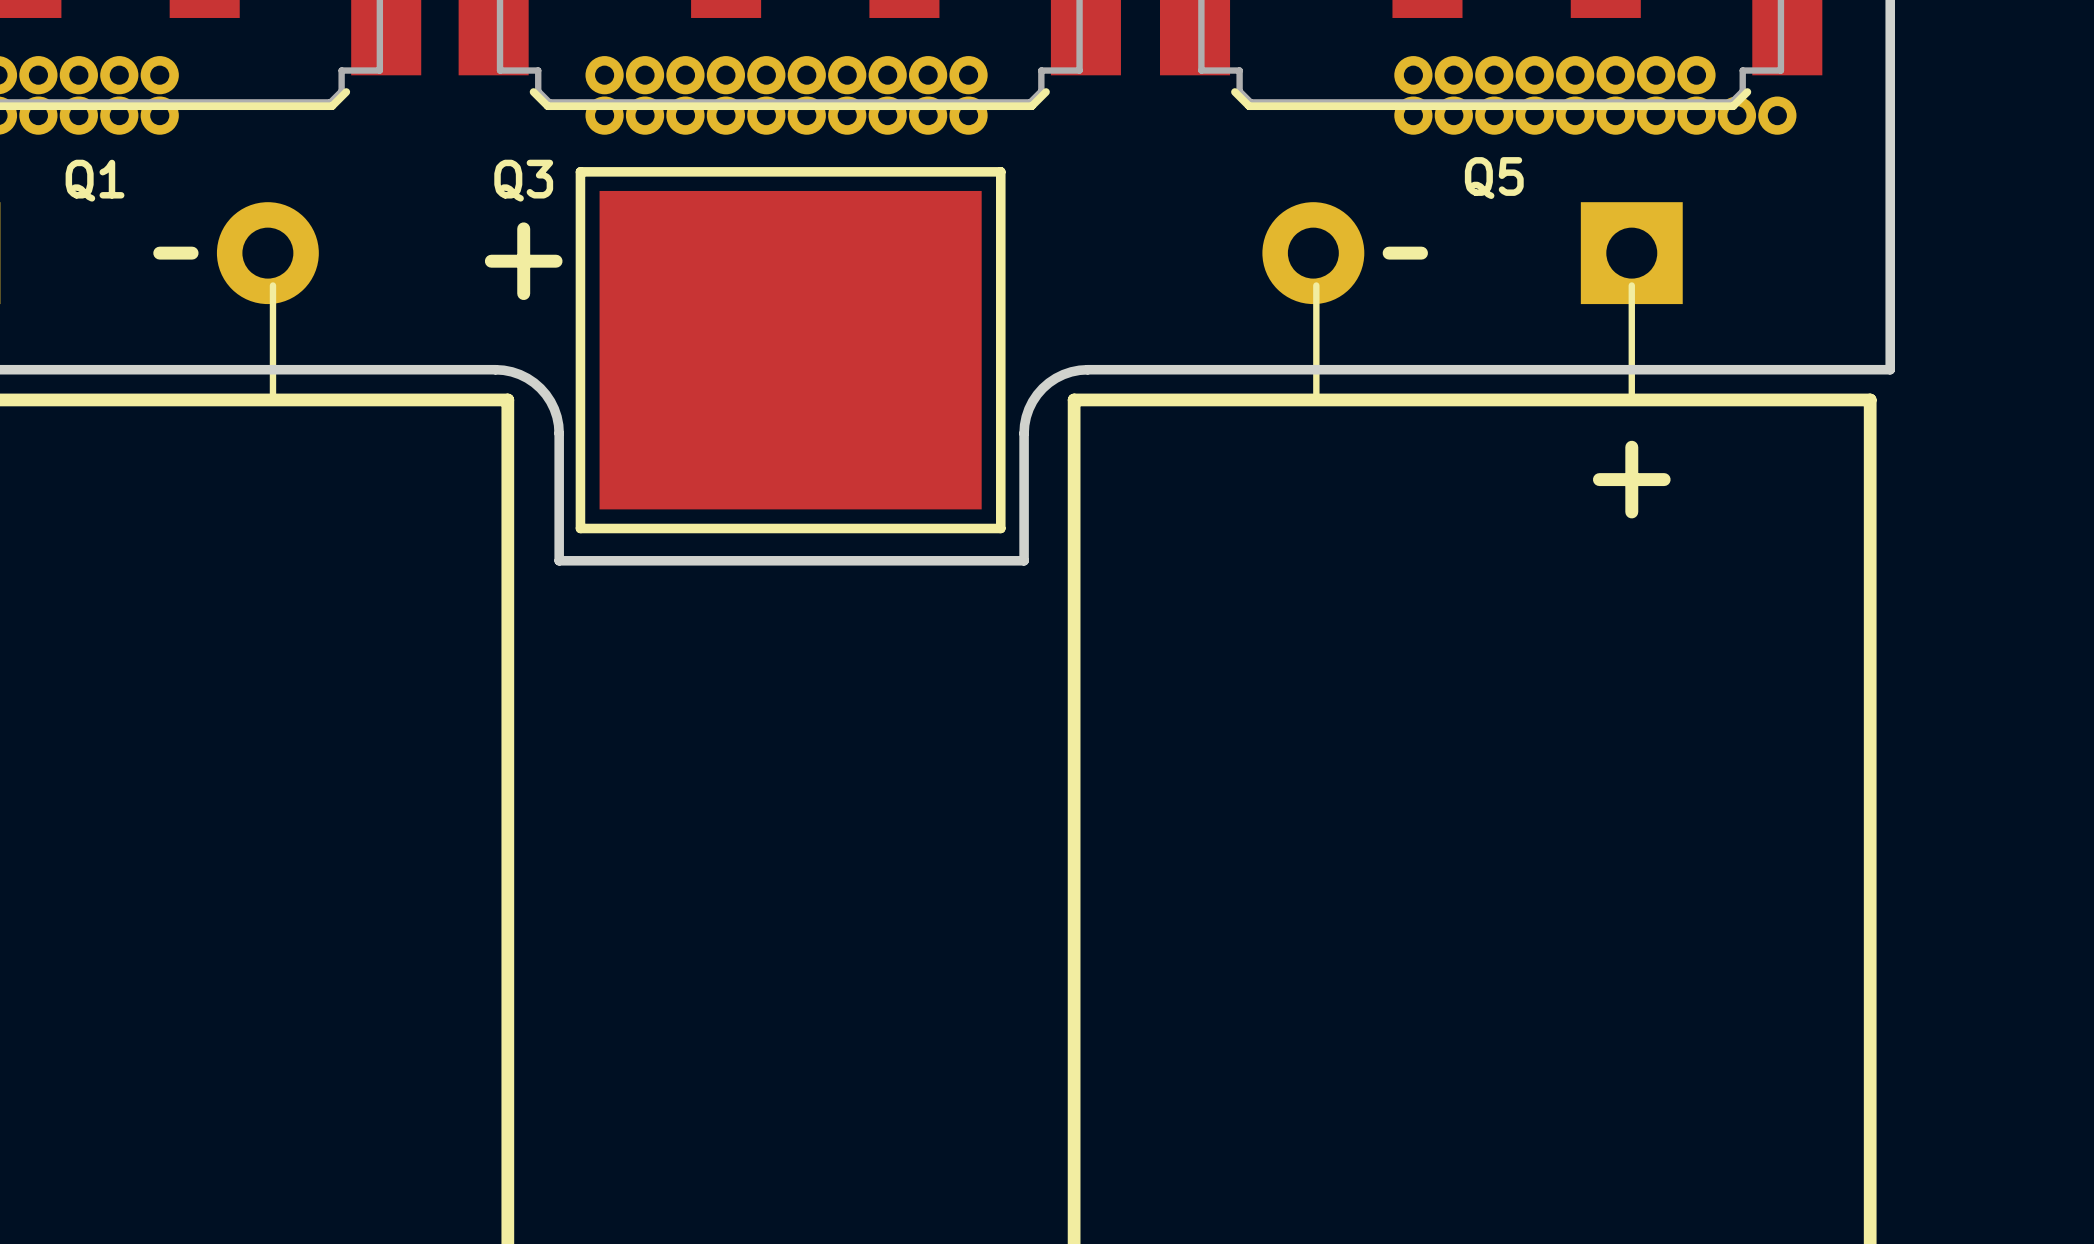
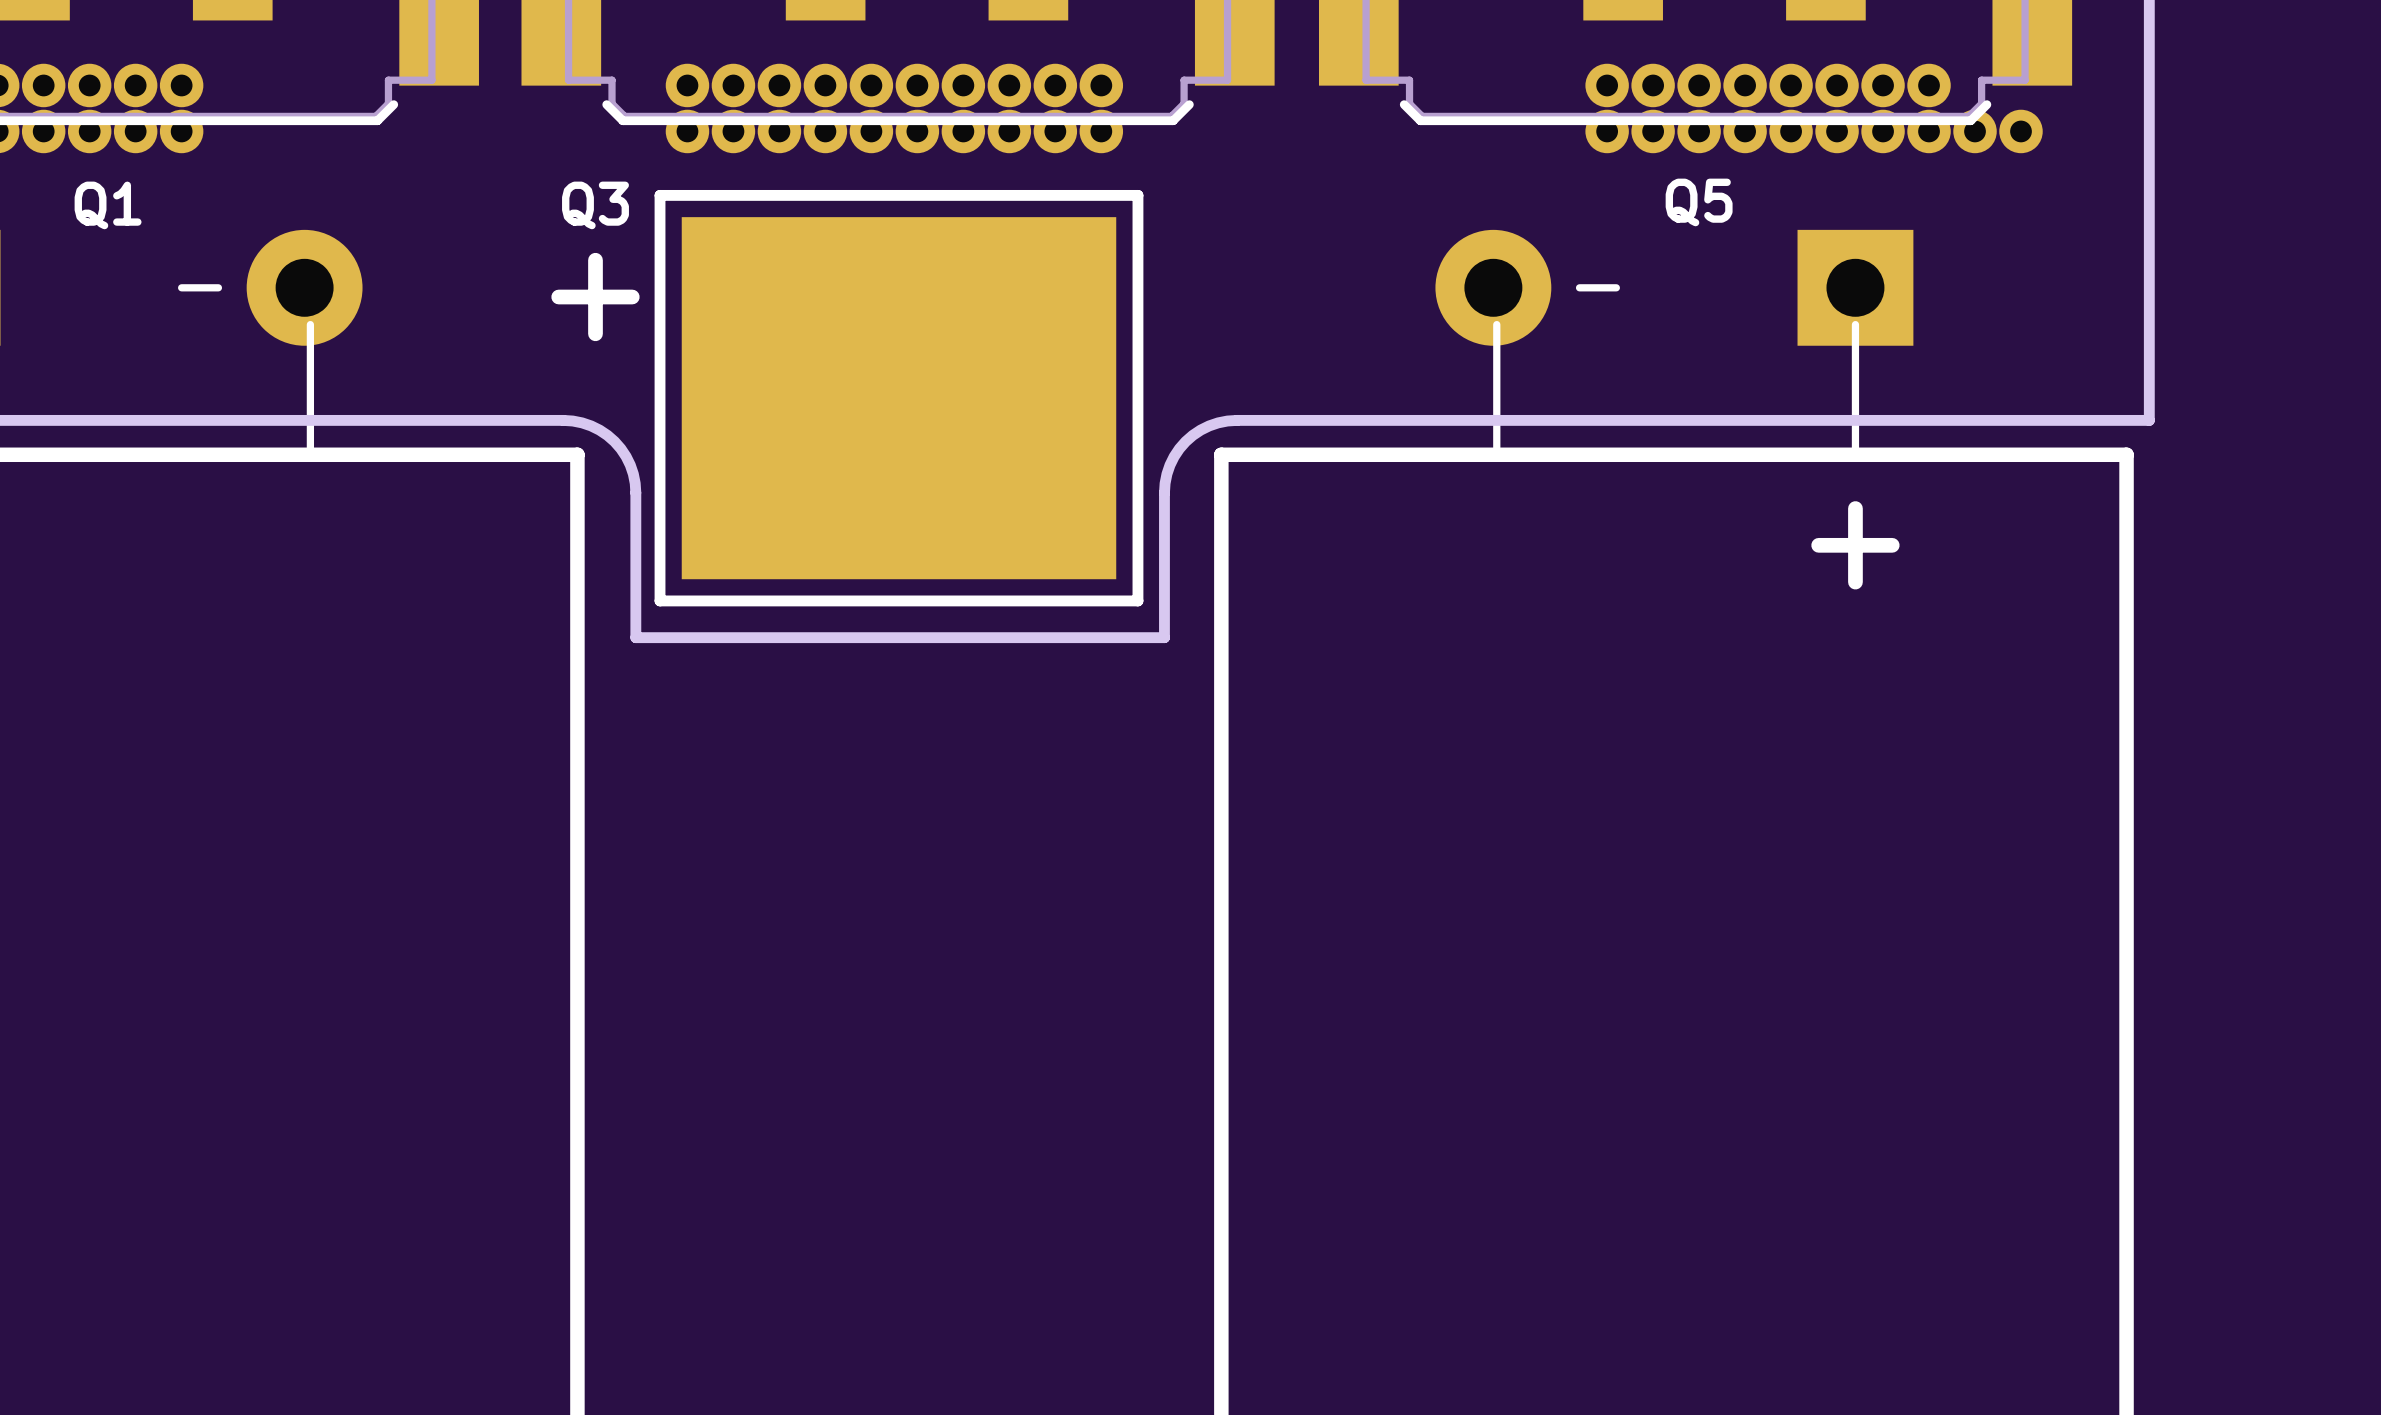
line width: thick (159, 253) (192, 253) -> thin (181, 287) (218, 287)
line width: thick (1389, 253) (1421, 253) -> thin (1579, 287) (1616, 287)

